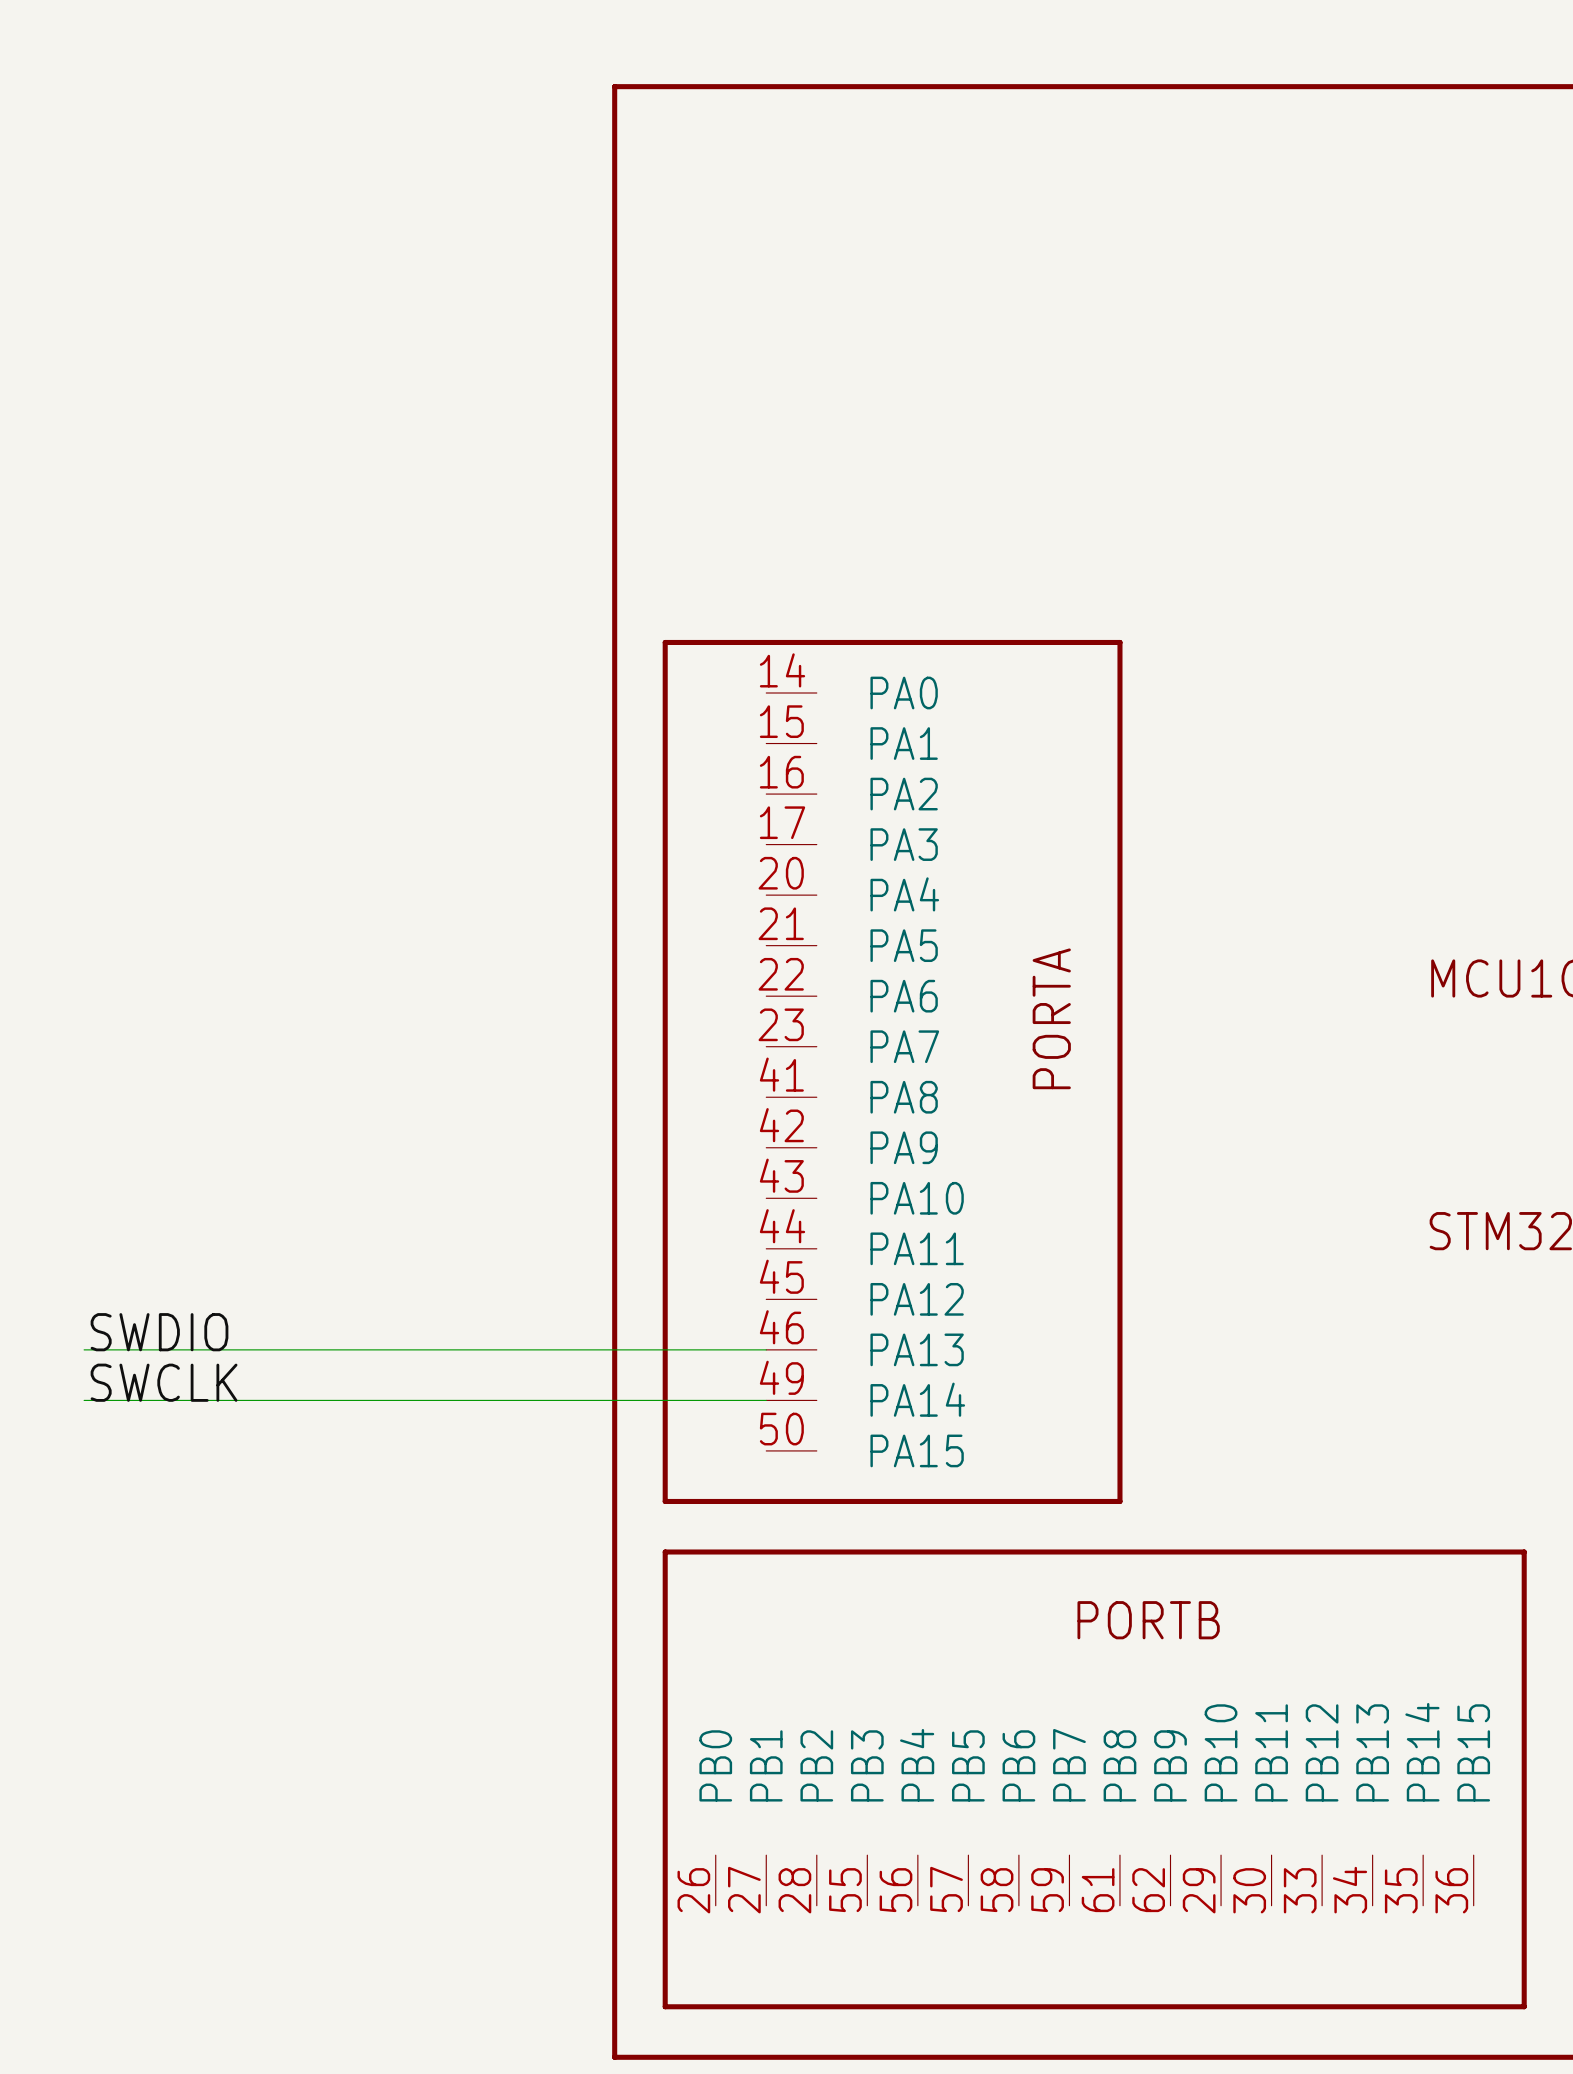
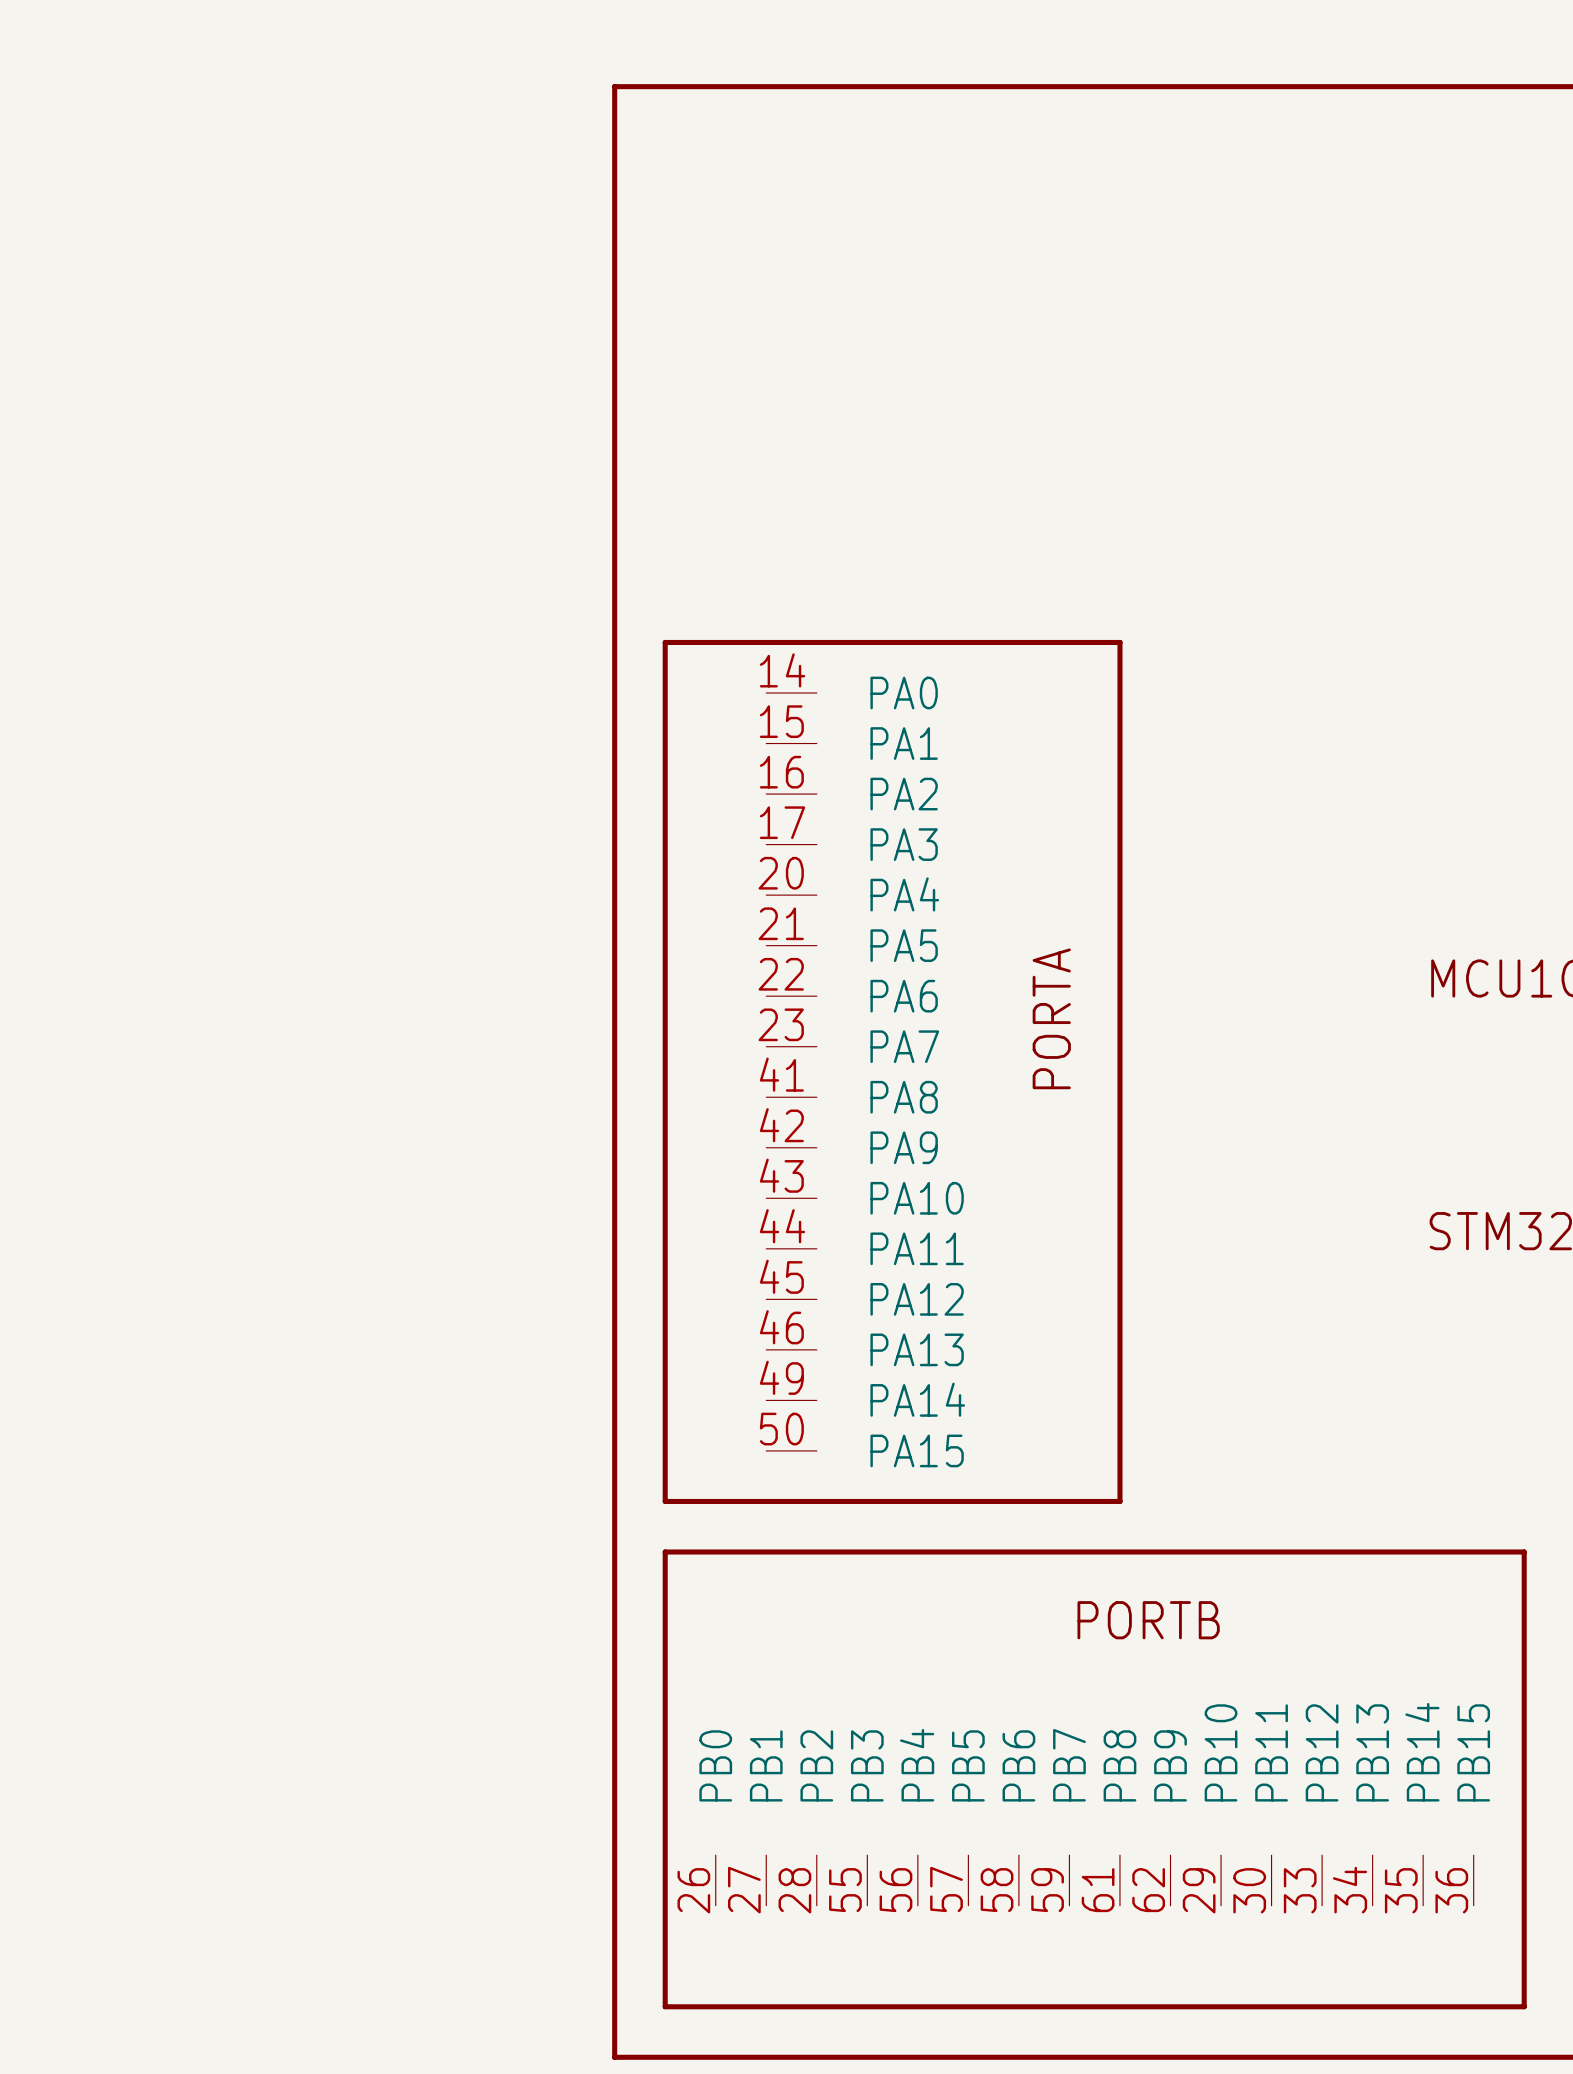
label: SWDIO (159, 1332) -> none
wire: (84, 1349) (766, 1349) -> none
label: SWCLK (164, 1382) -> none
wire: (84, 1400) (766, 1400) -> none

